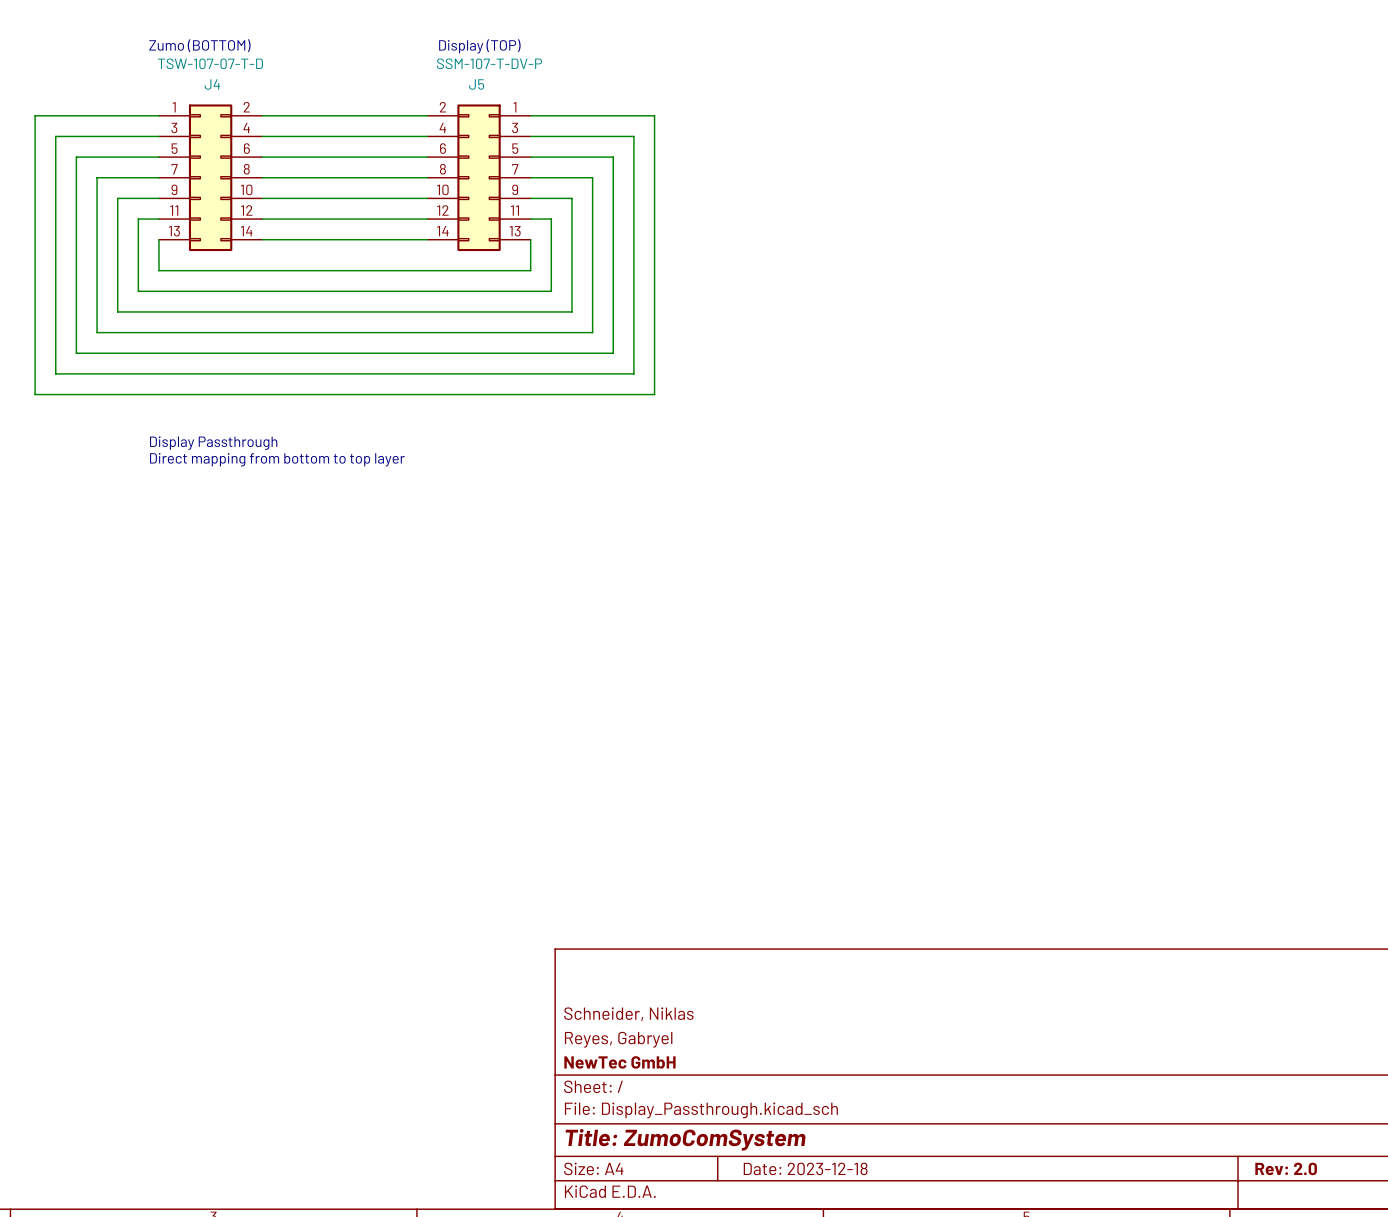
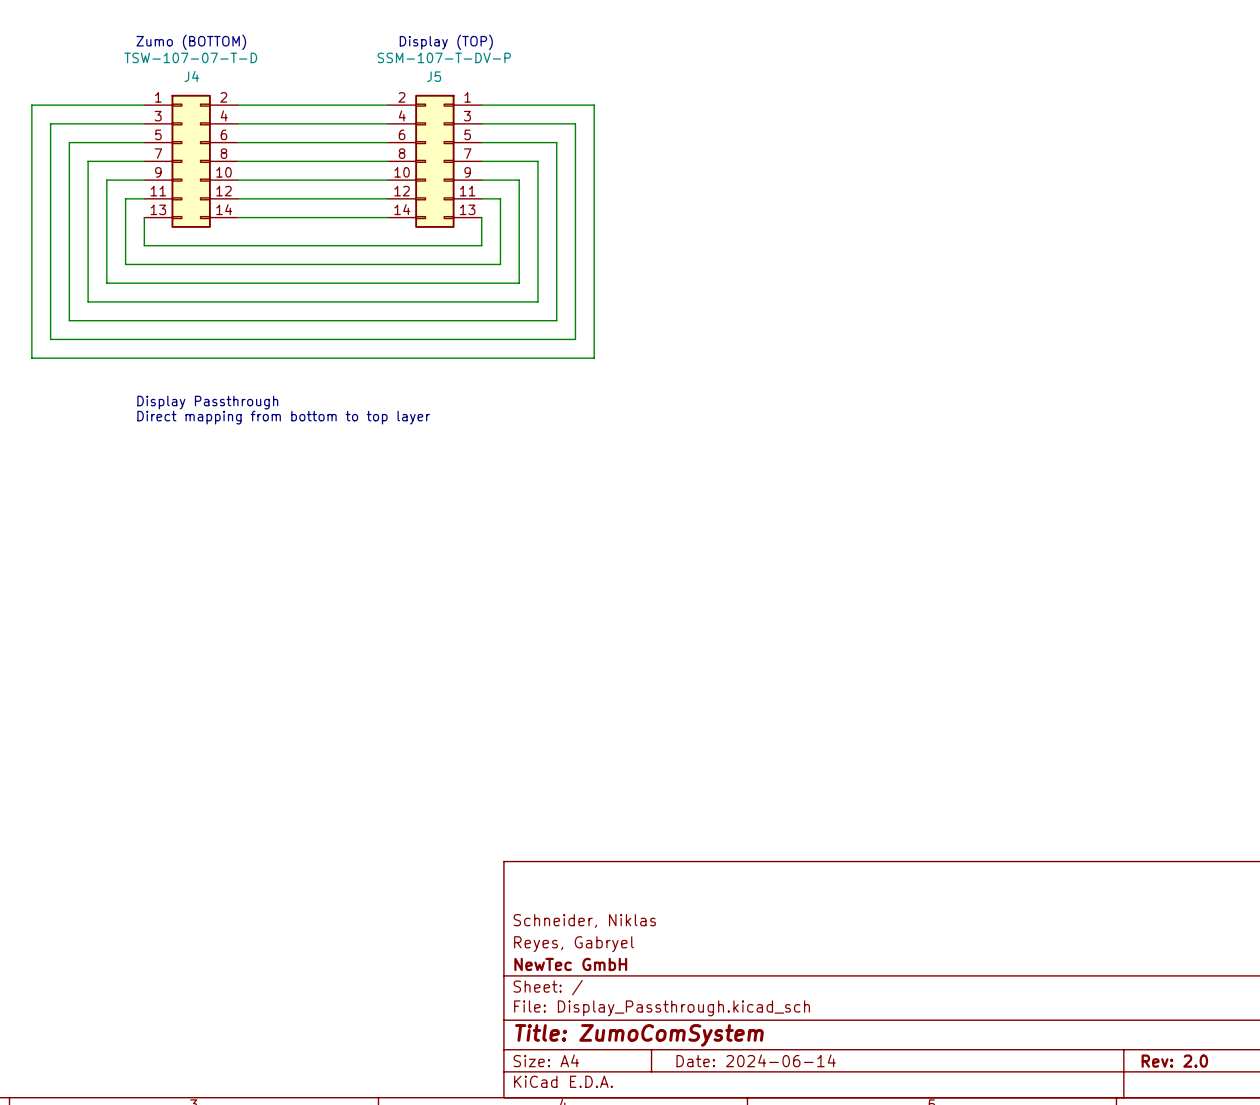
title block: Date: 2023-12-18 (805, 1168) -> Date: 2024-06-14 (756, 1060)

